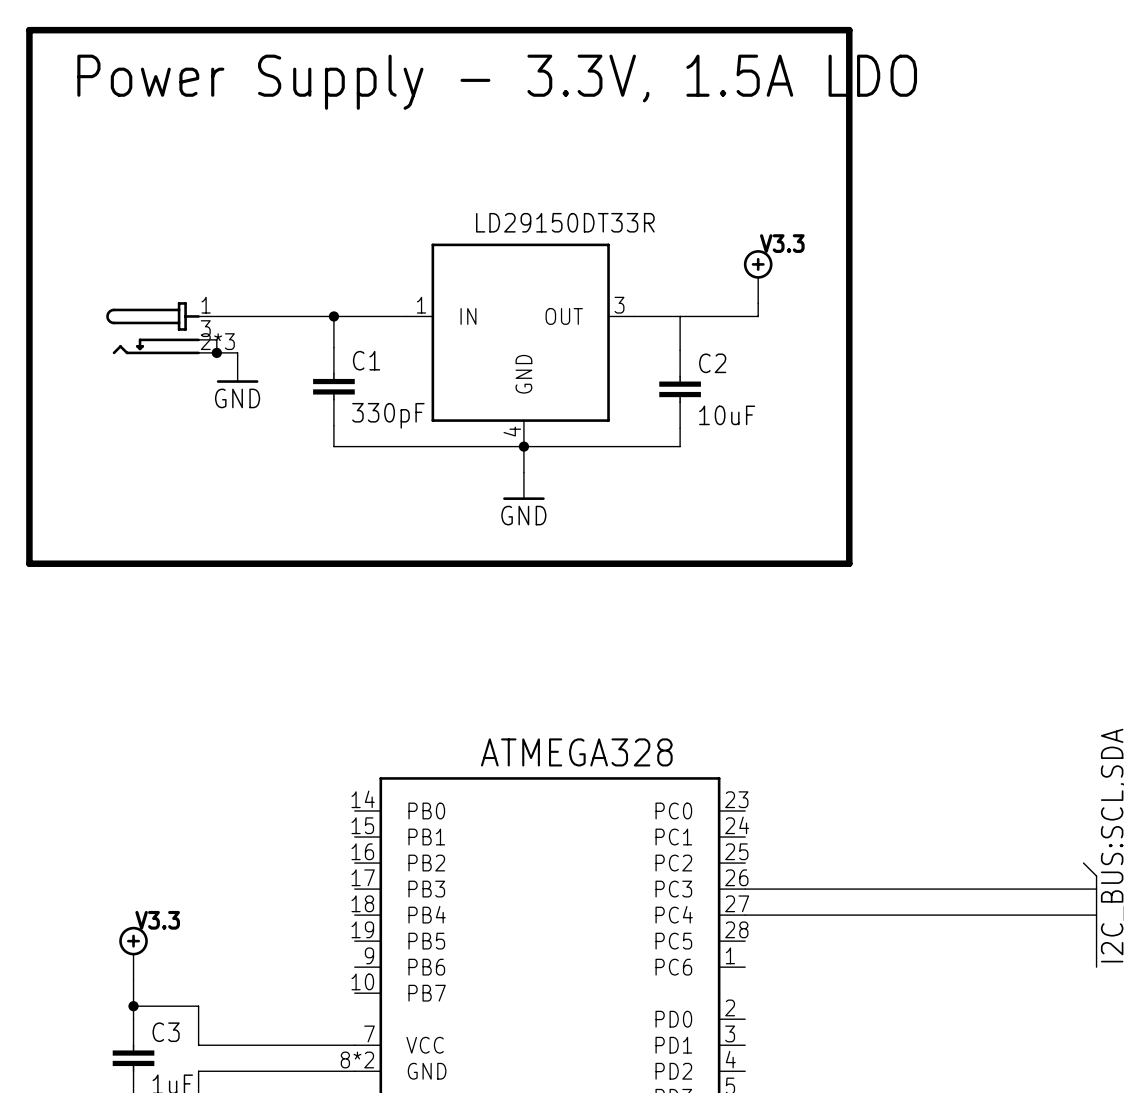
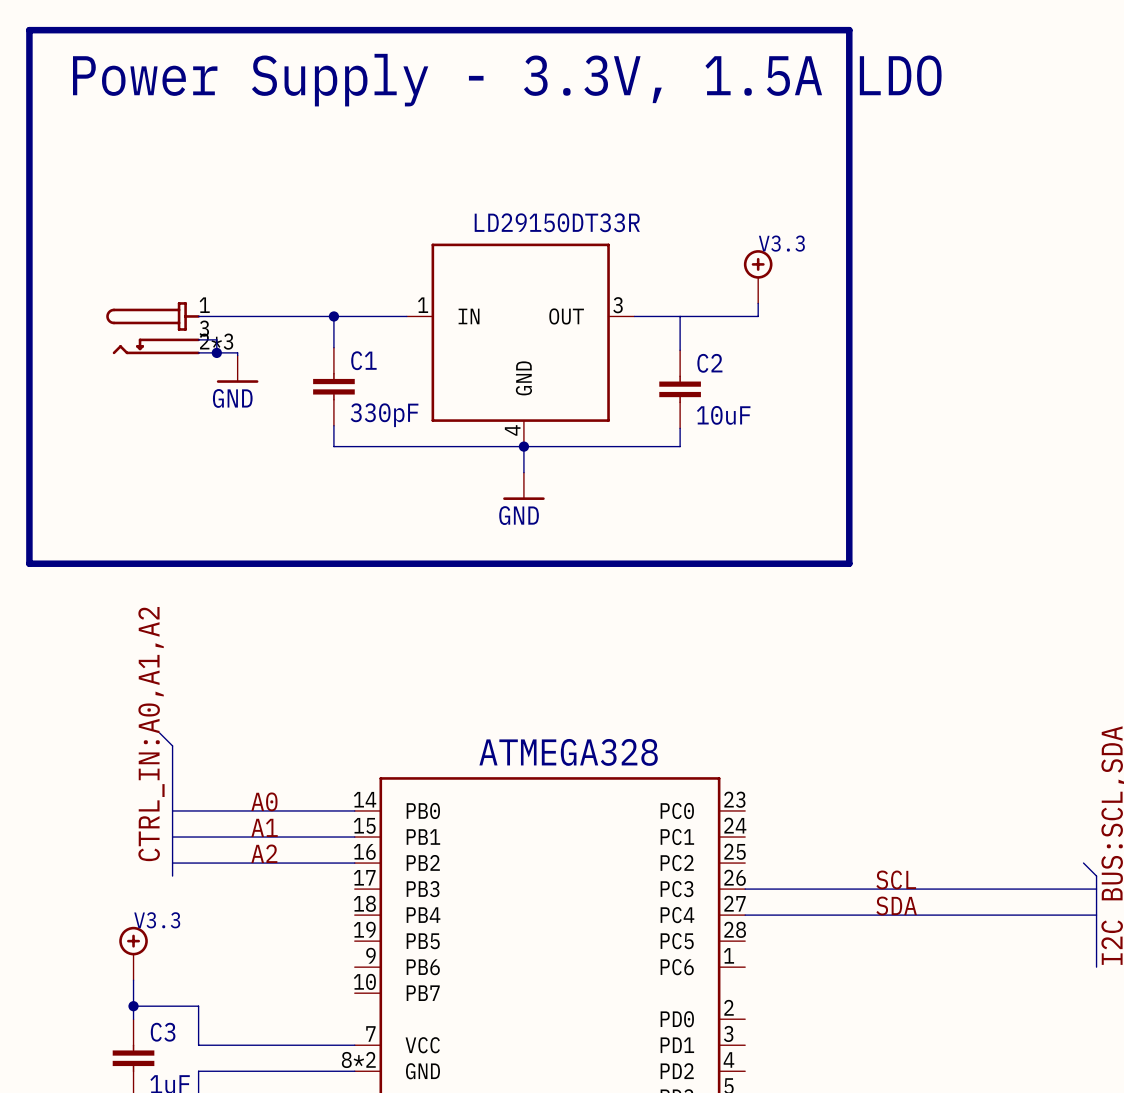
bus: none -> (159, 732) (172, 745) (172, 876)
label: none -> CTRL_IN:A0,A1,A2 (151, 734)
label: none -> A0 (264, 801)
wire: none -> (172, 810) (354, 810)
label: none -> A1 (264, 827)
wire: none -> (172, 837) (354, 837)
label: none -> A2 (264, 853)
wire: none -> (172, 863) (354, 863)
label: none -> SCL (896, 879)
label: none -> SDA (896, 905)

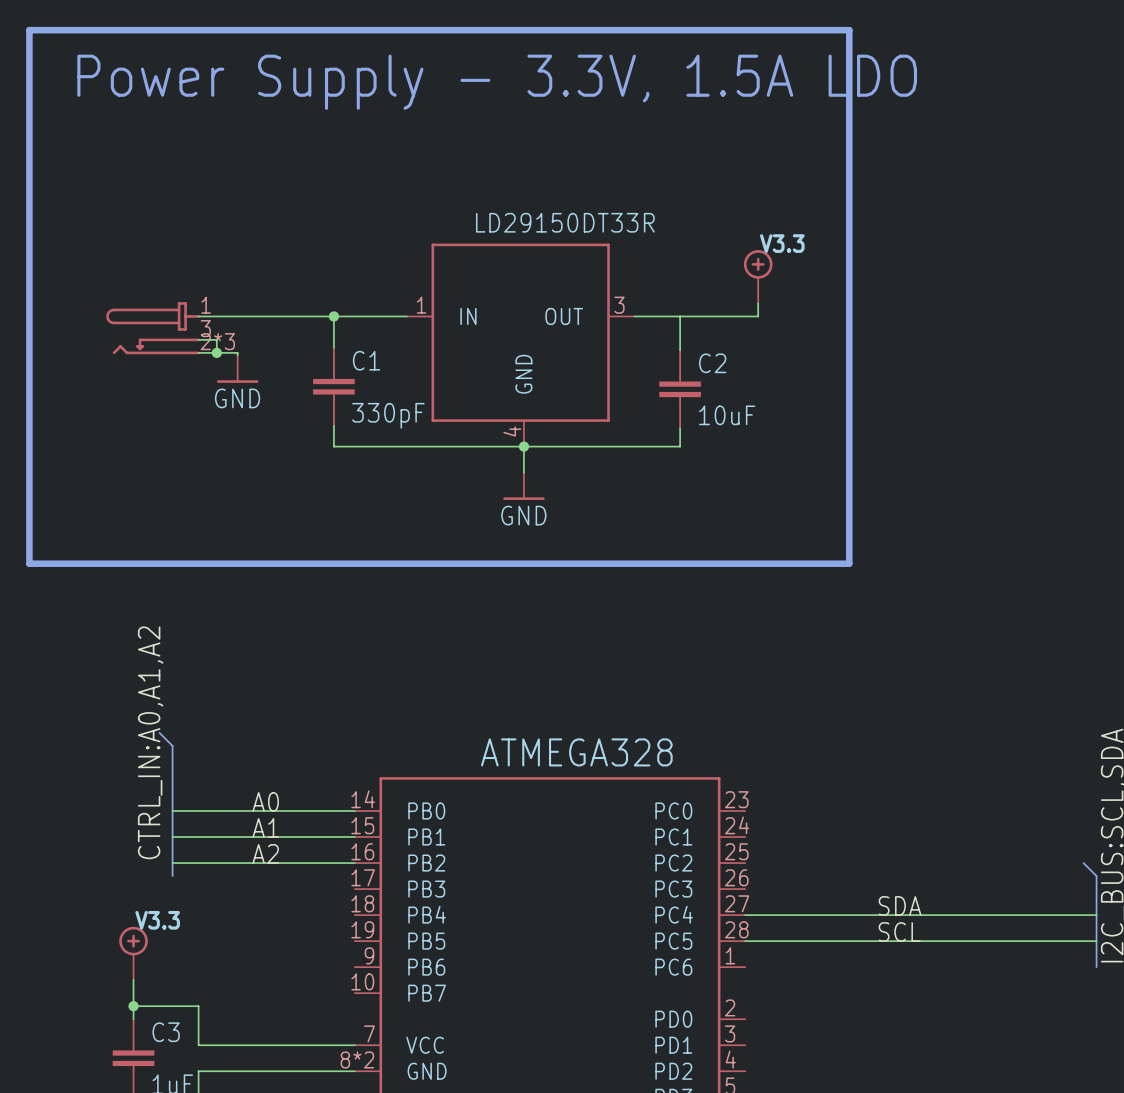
label position: SCL (896, 879) -> SCL (899, 932)
wire: (745, 889) (1096, 889) -> (745, 941) (1096, 941)

